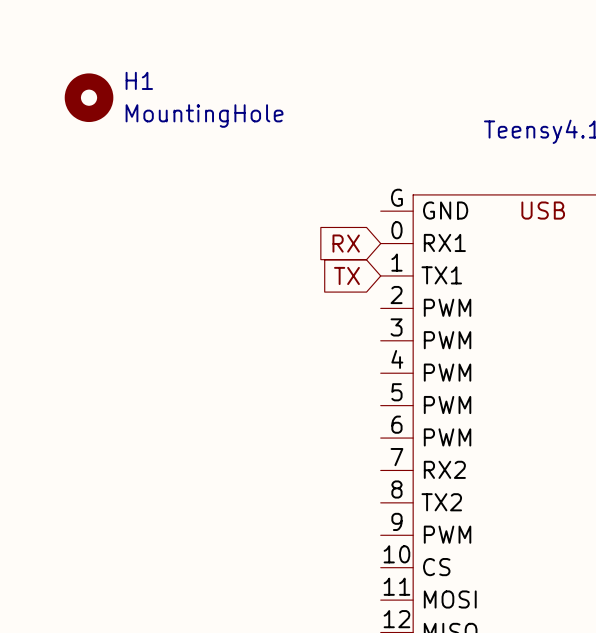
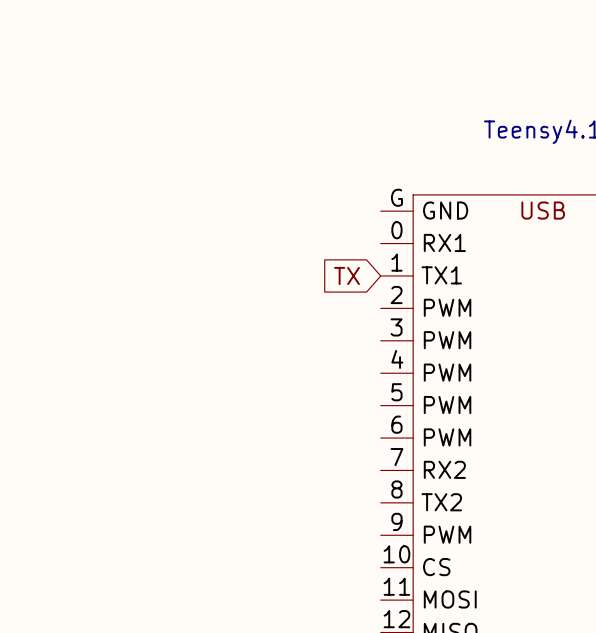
H1: MountingHole (89, 97) -> none
global label: RX (346, 243) -> none

